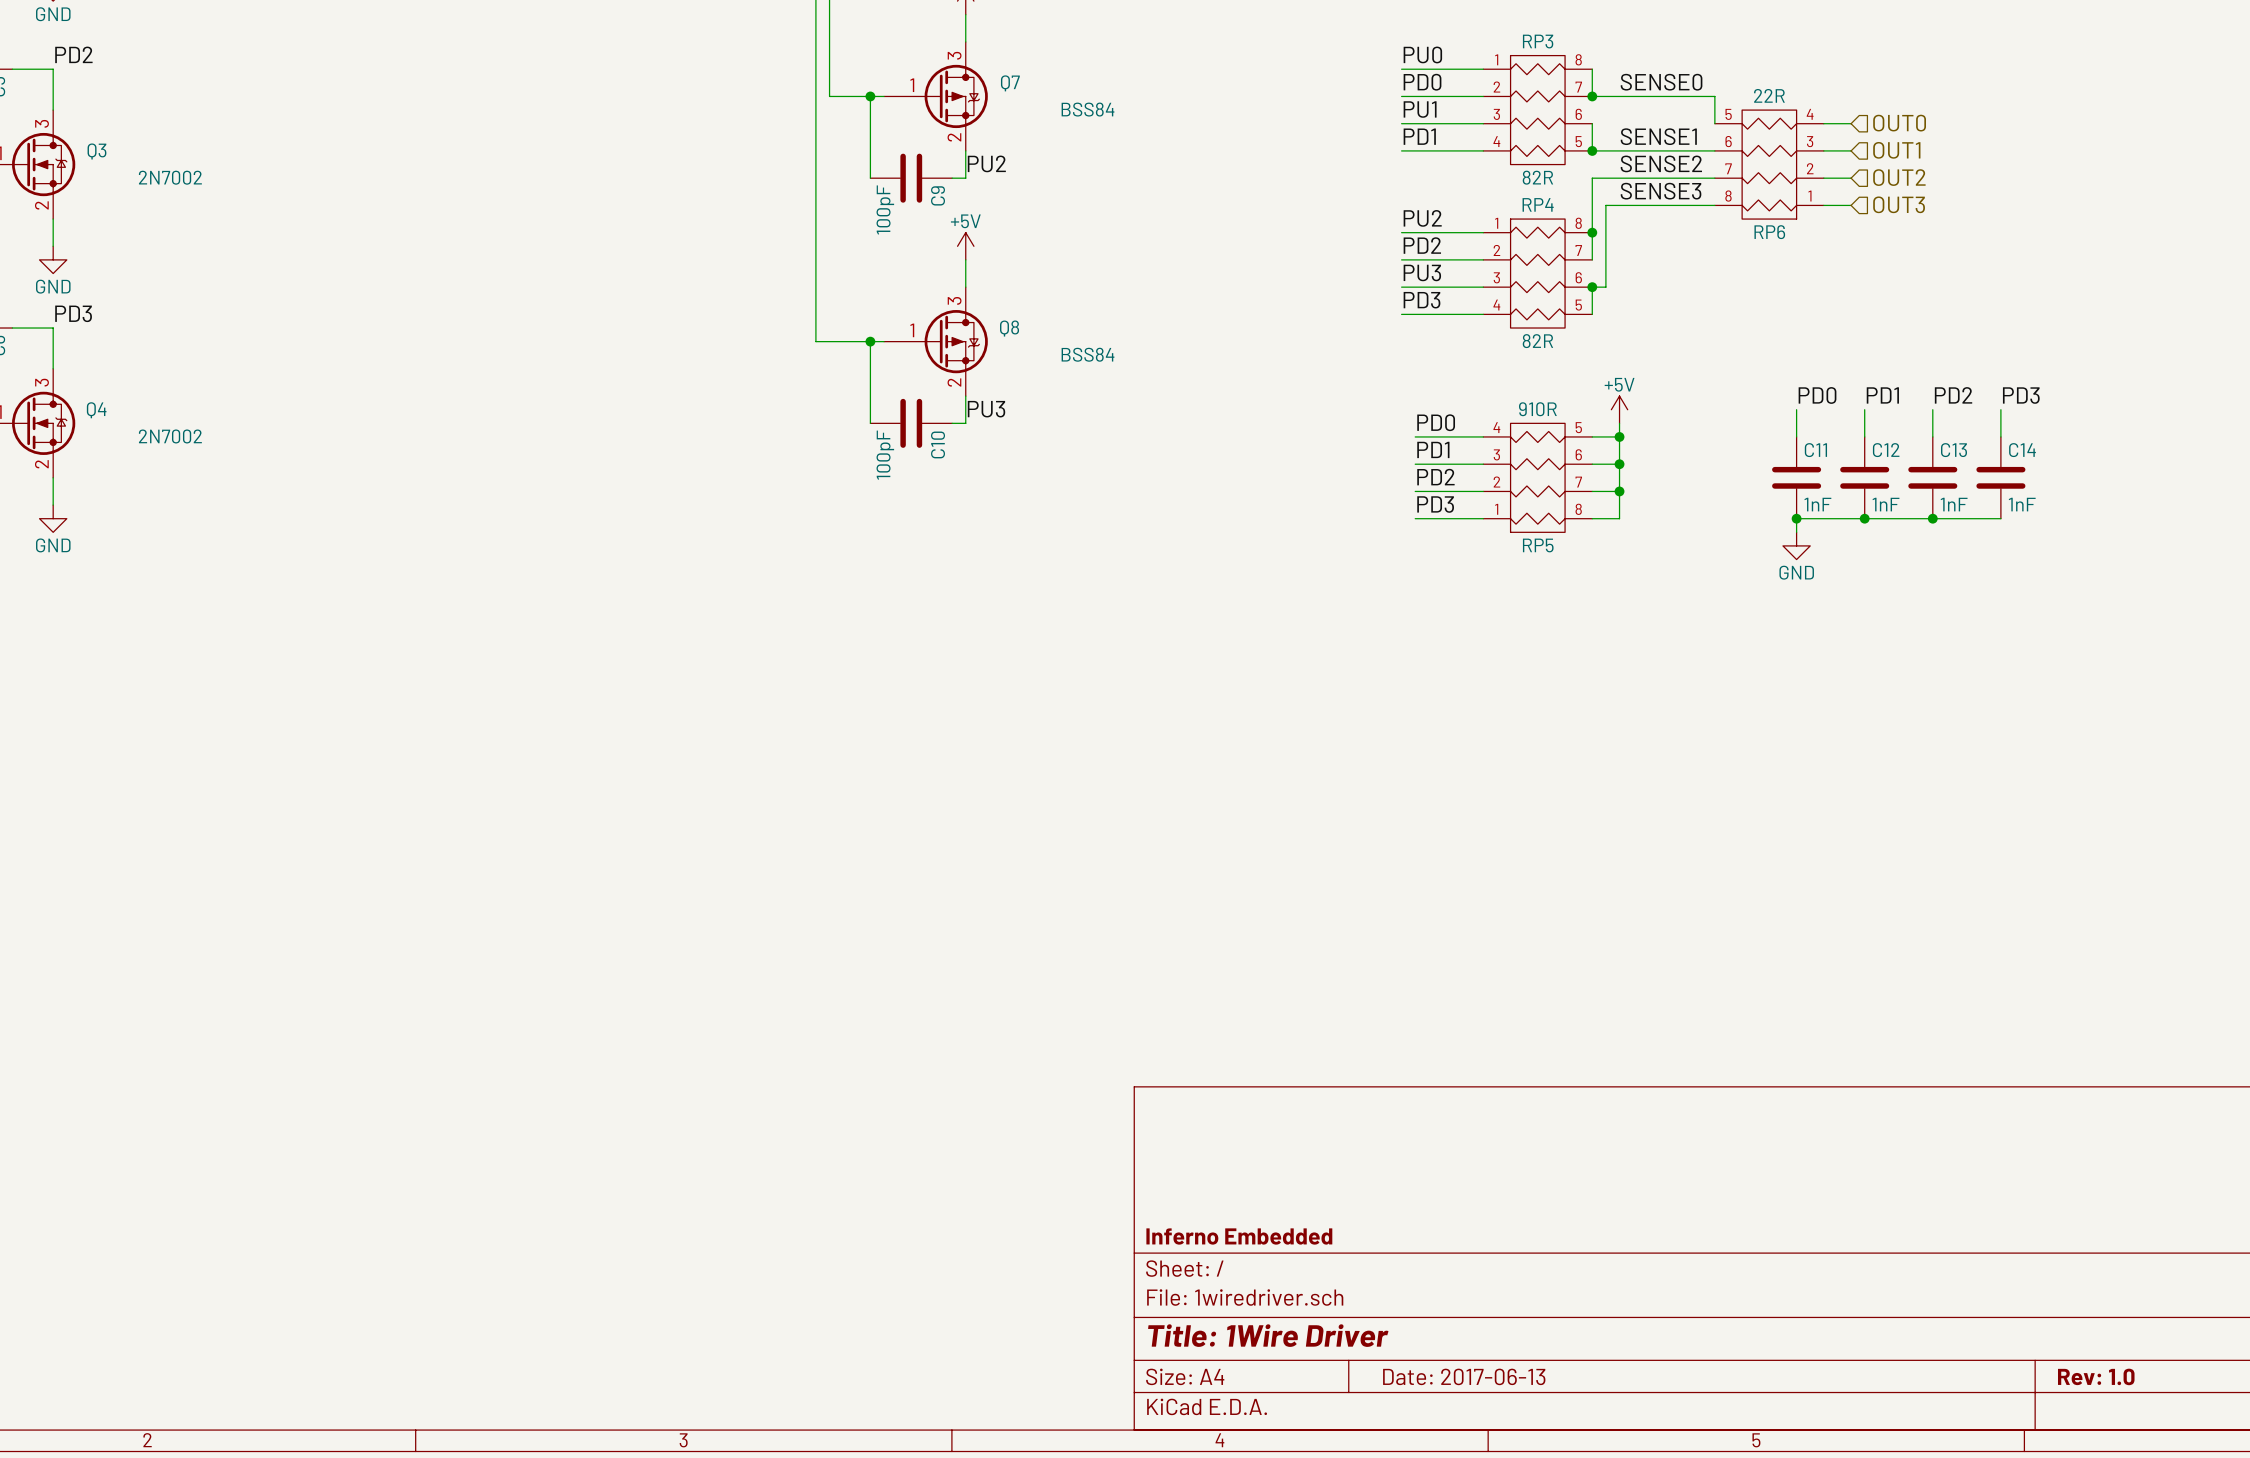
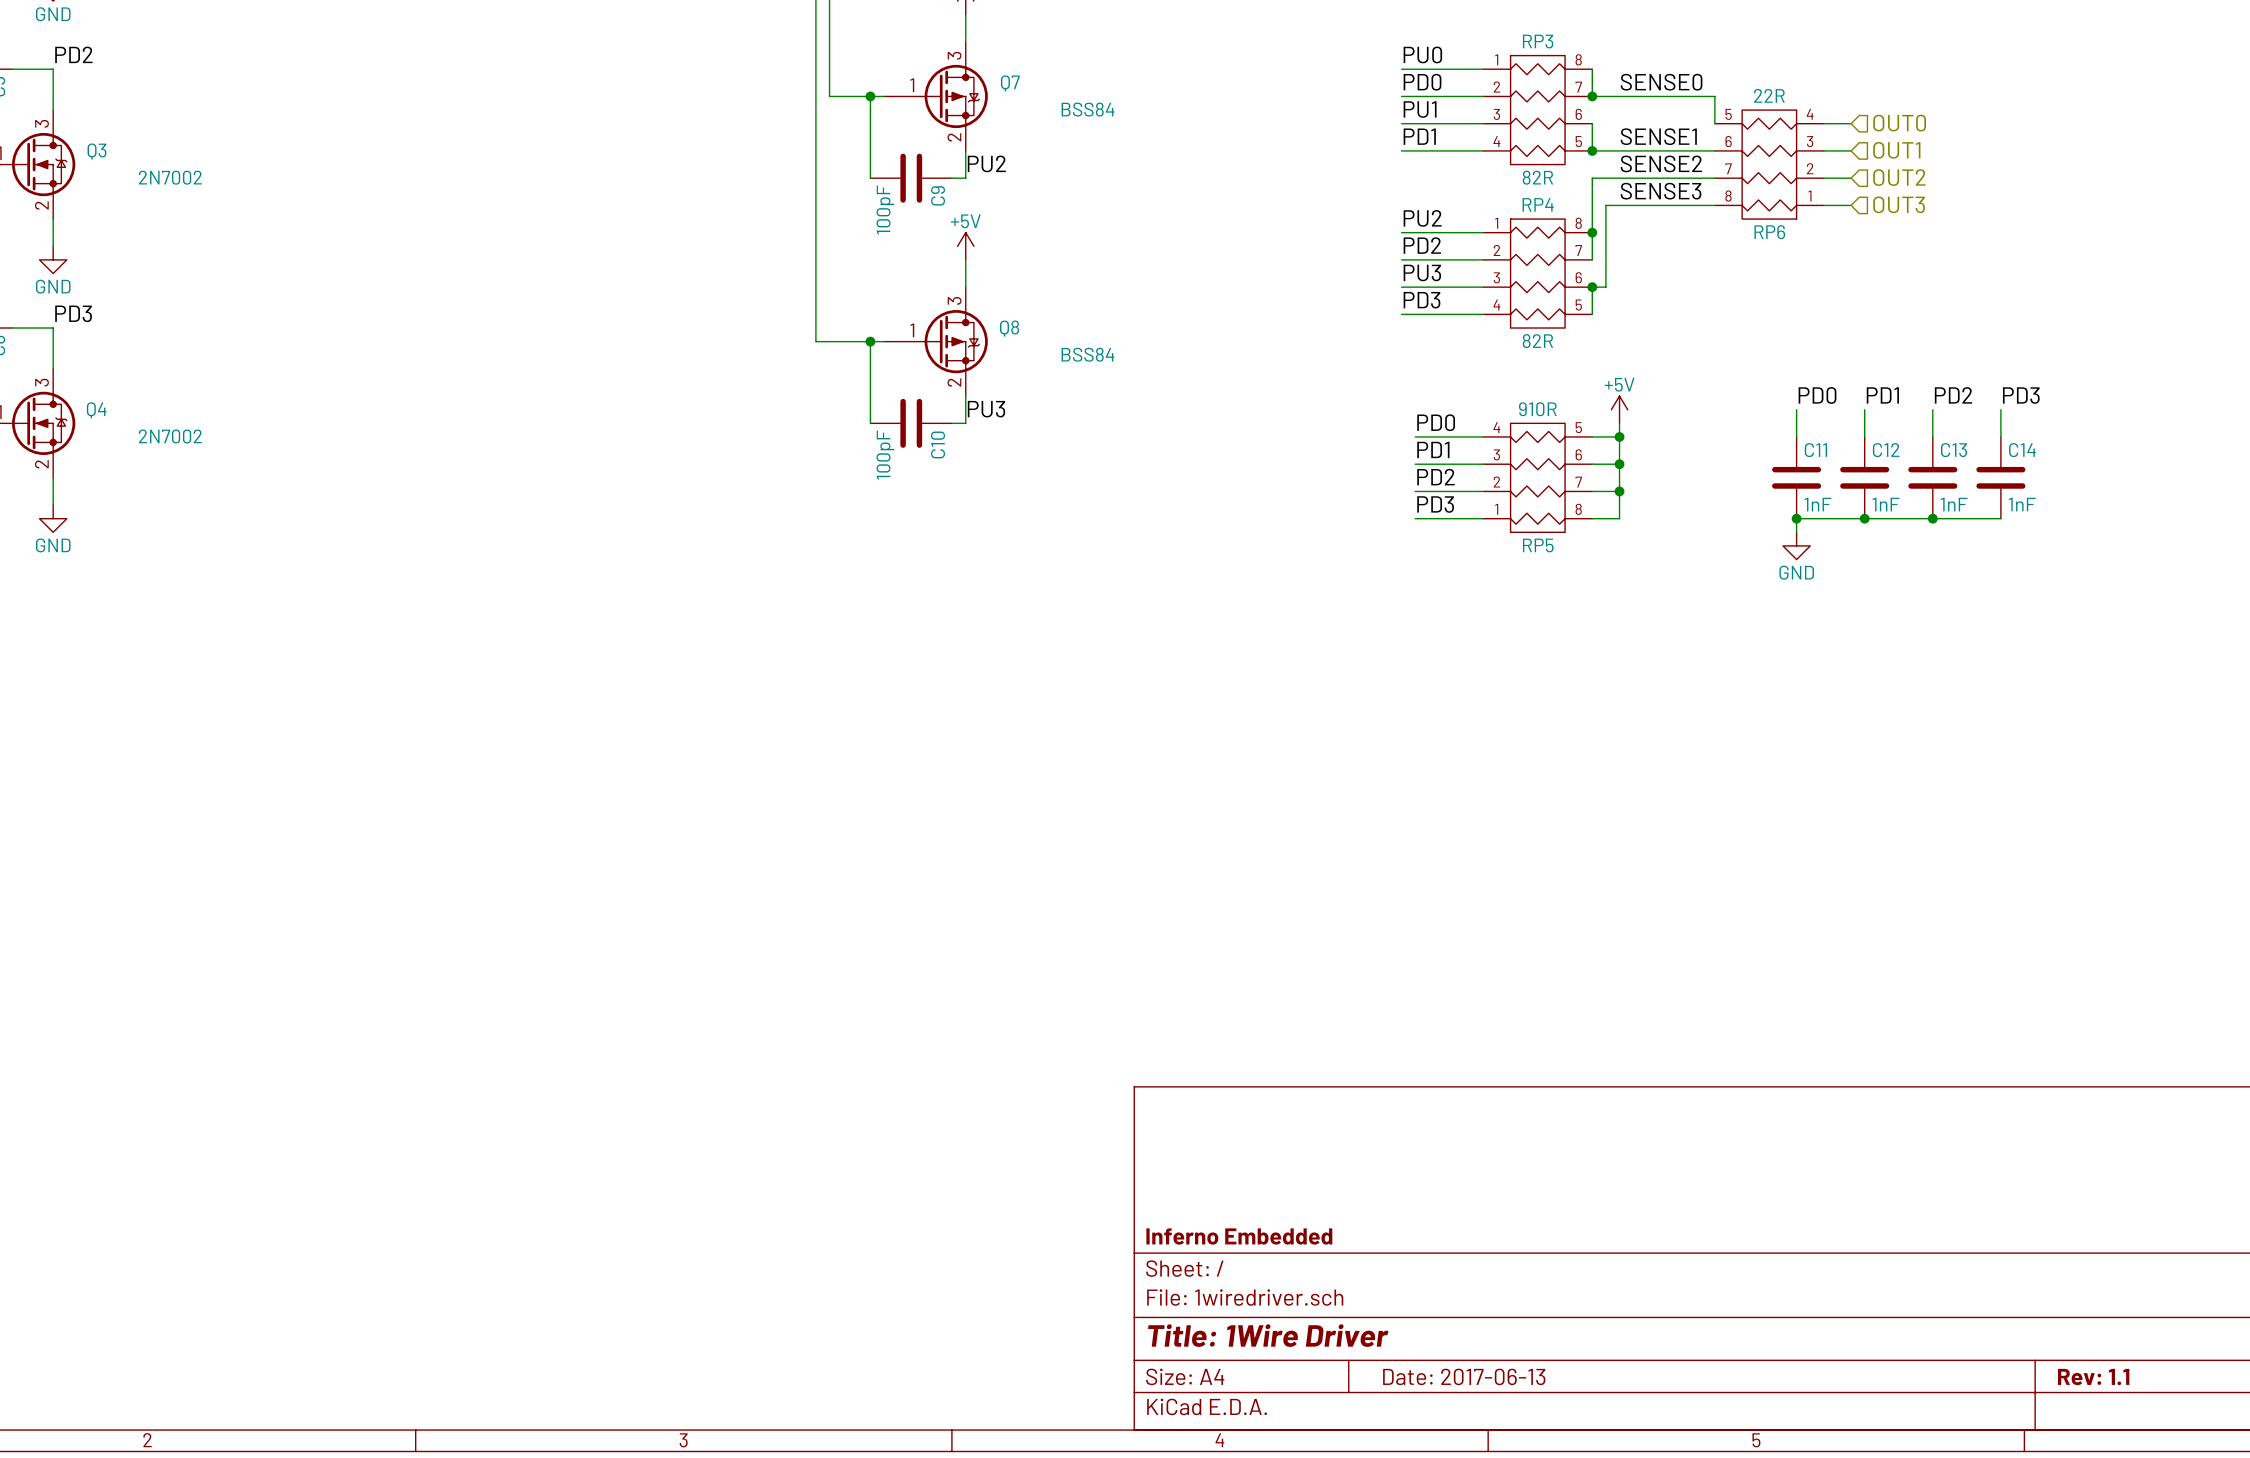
title block: Rev: 1.0 (2096, 1376) -> Rev: 1.1 (2093, 1376)

